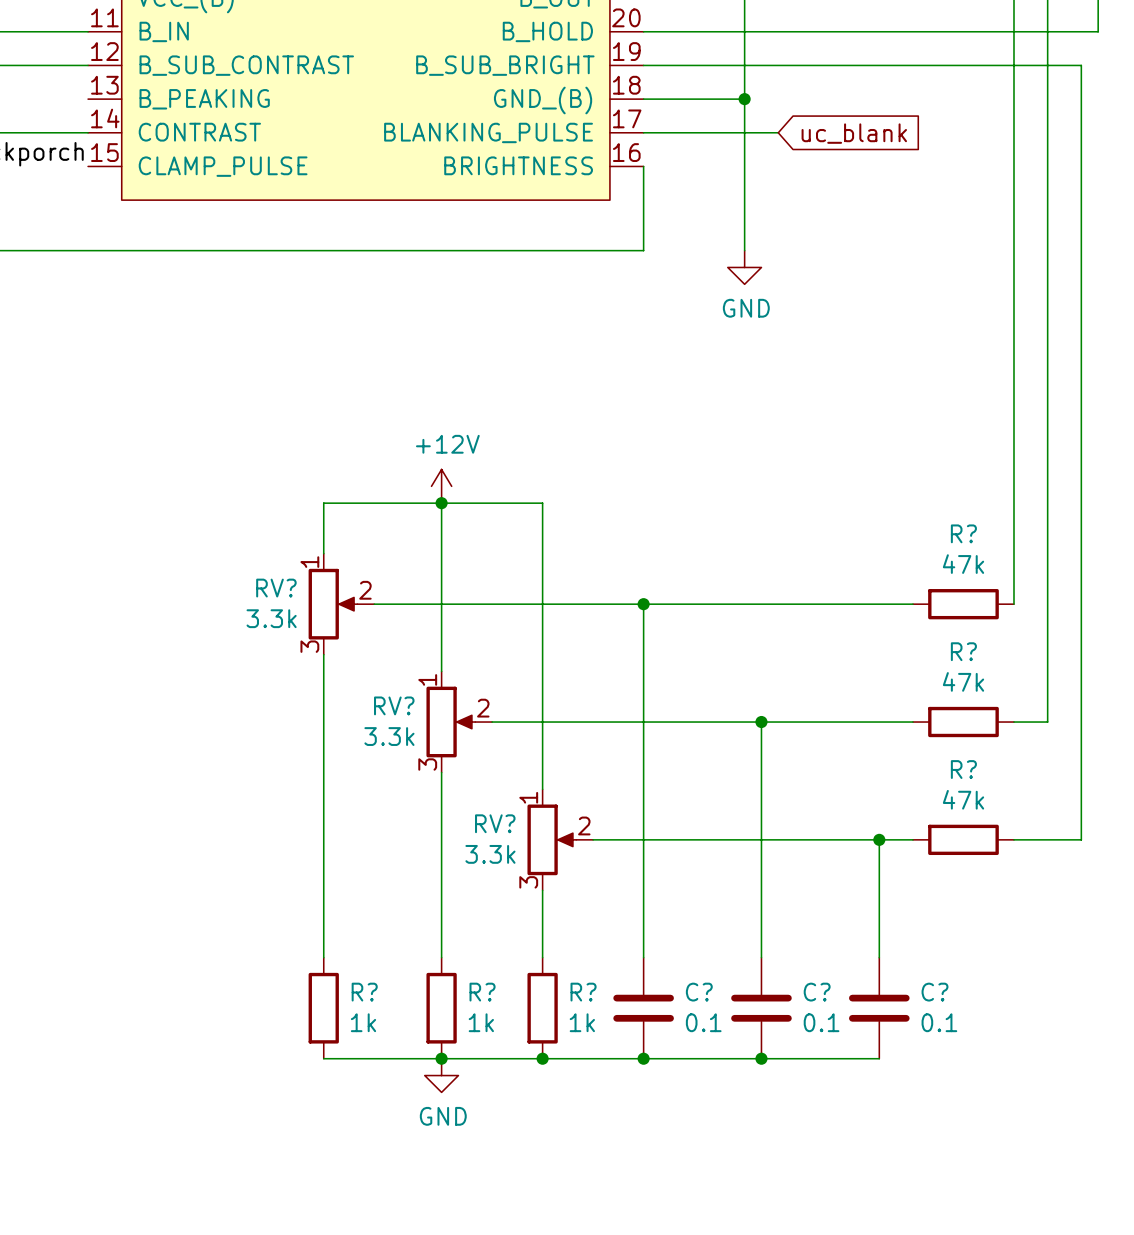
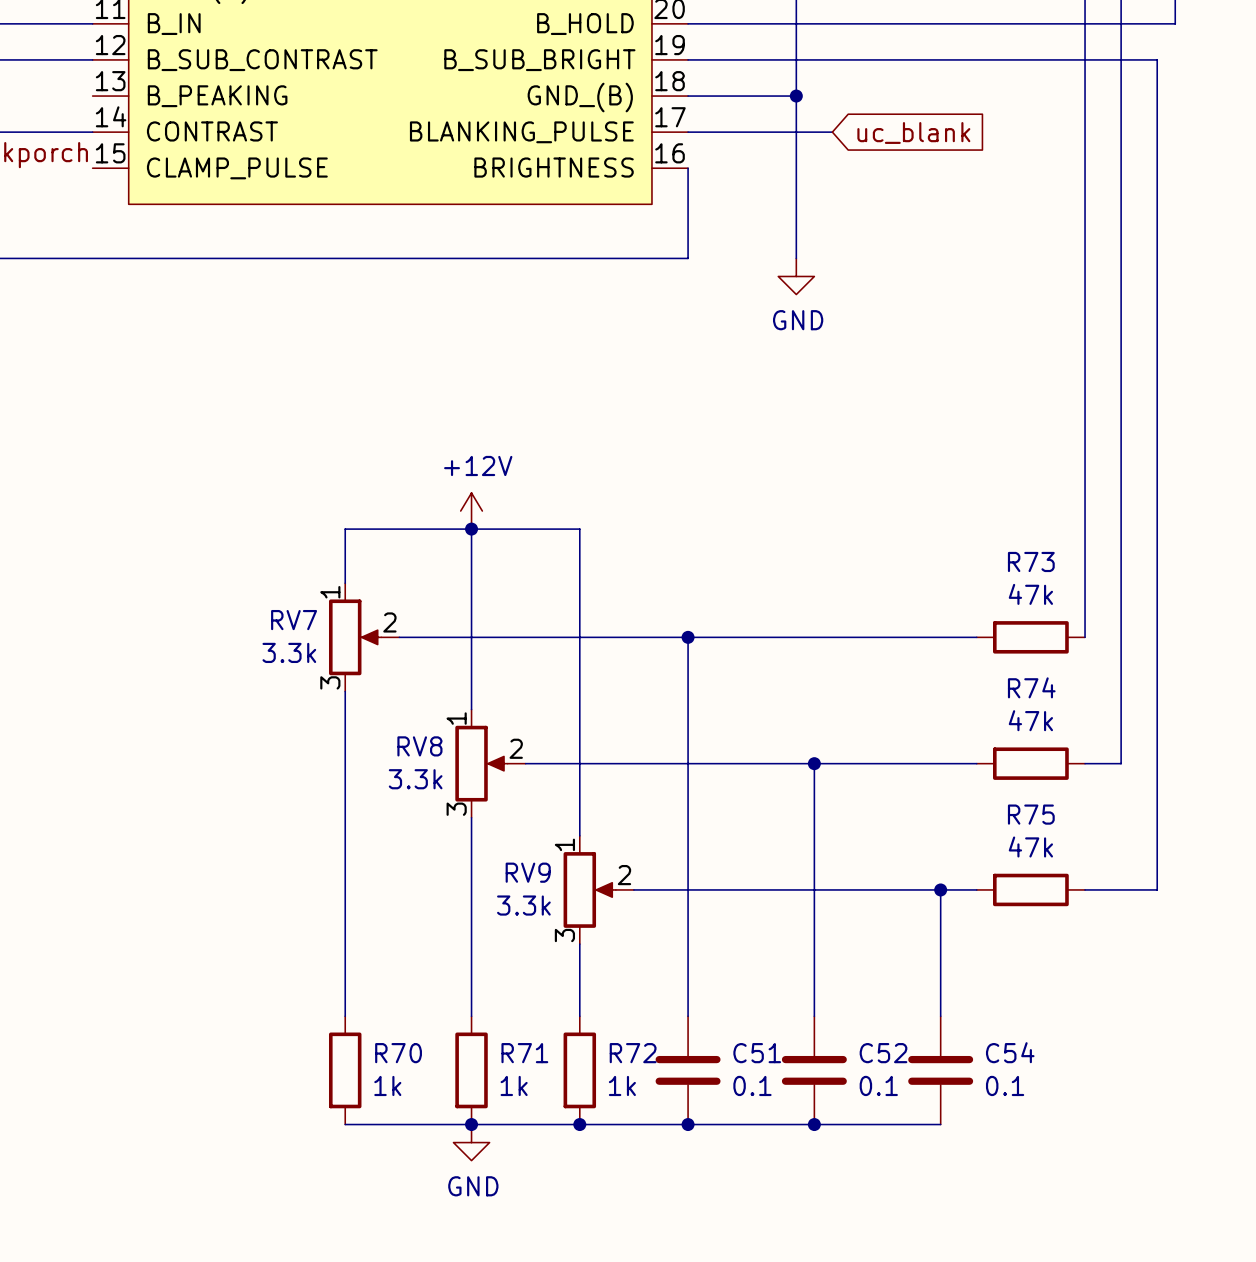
R? name: R? (963, 533) -> R73 (1031, 561)
RV? name: RV? (276, 588) -> RV7 (294, 620)
R? name: R? (963, 651) -> R74 (1031, 687)
RV? name: RV? (394, 705) -> RV8 (419, 746)
R? name: R? (963, 769) -> R75 (1031, 814)
RV? name: RV? (495, 823) -> RV9 (528, 872)
R? name: R? (364, 992) -> R70 (398, 1053)
R? name: R? (482, 992) -> R71 (524, 1053)
R? name: R? (583, 992) -> R72 (633, 1053)
C? name: C? (699, 992) -> C51 (757, 1053)
C? name: C? (817, 992) -> C52 (883, 1053)
C? name: C? (934, 992) -> C54 (1010, 1052)

